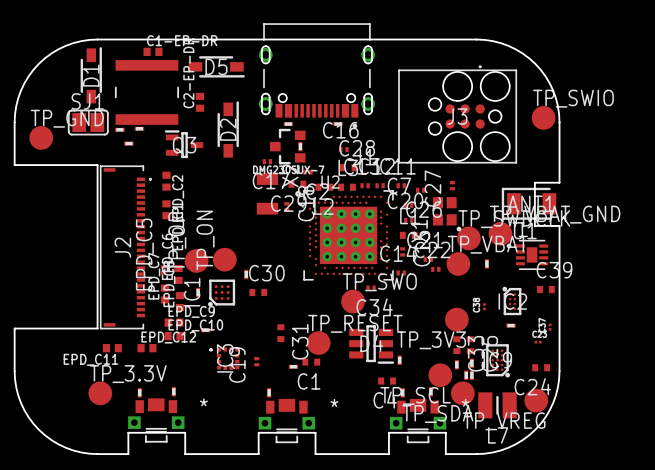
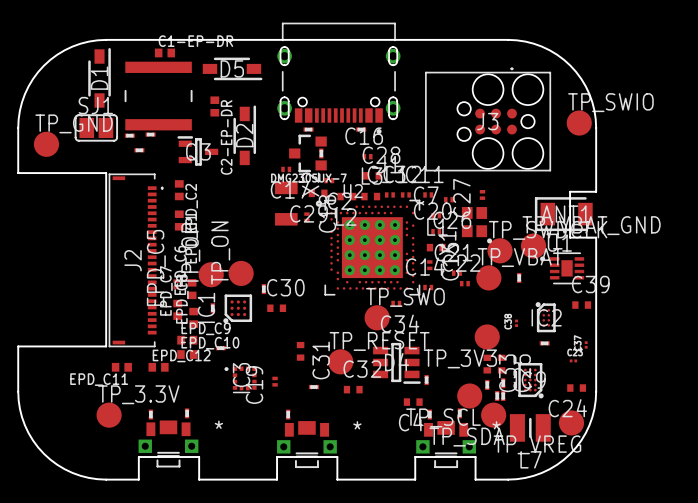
C2-EP-DR name position: C2-EP-DR (188, 73) -> C2-EP-DR (226, 137)
C1: (311, 362) -> none
C32: none -> (353, 389)

